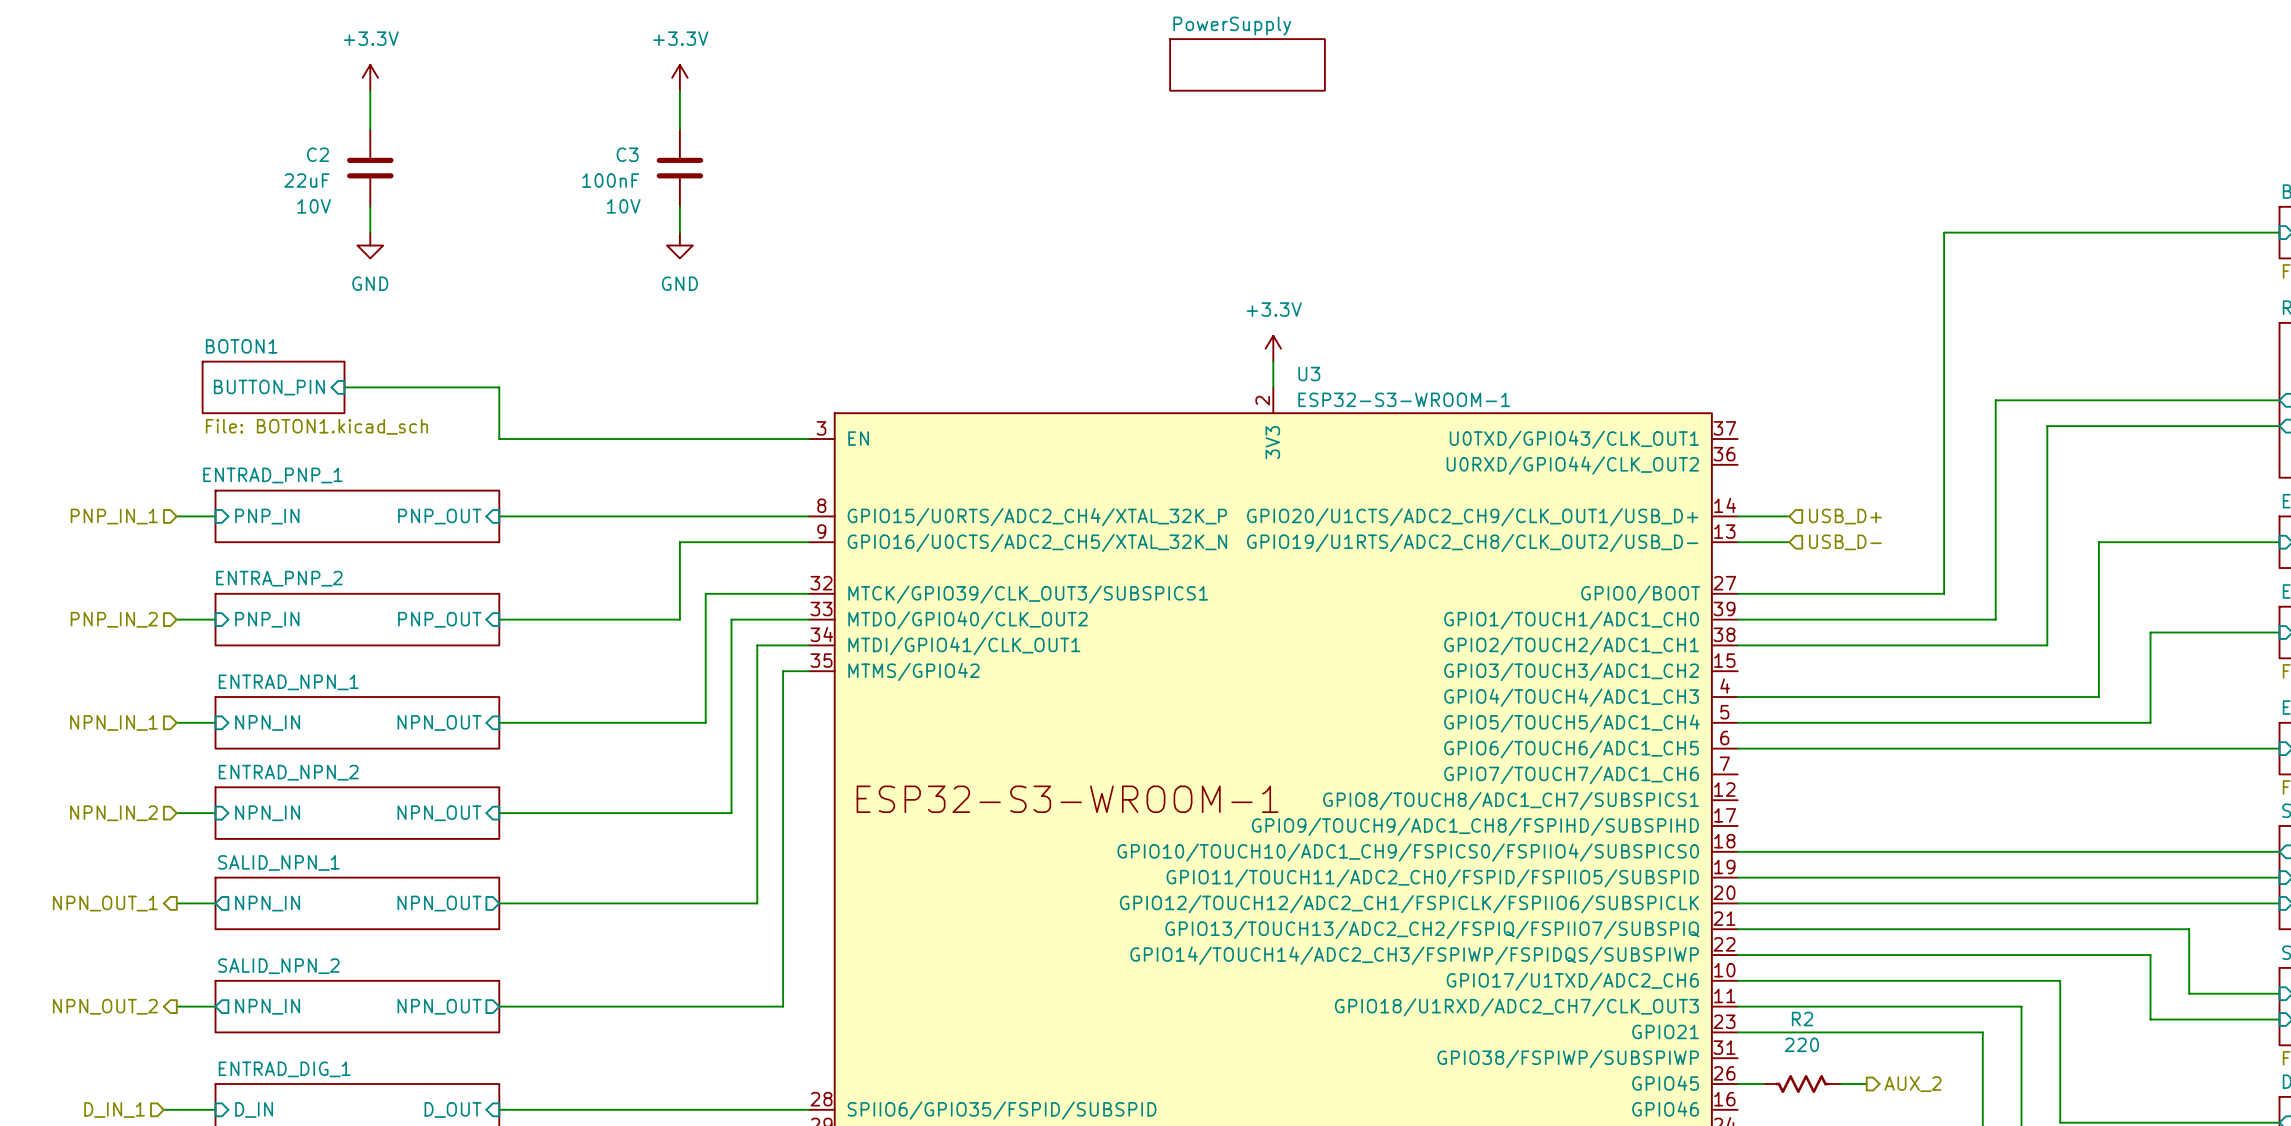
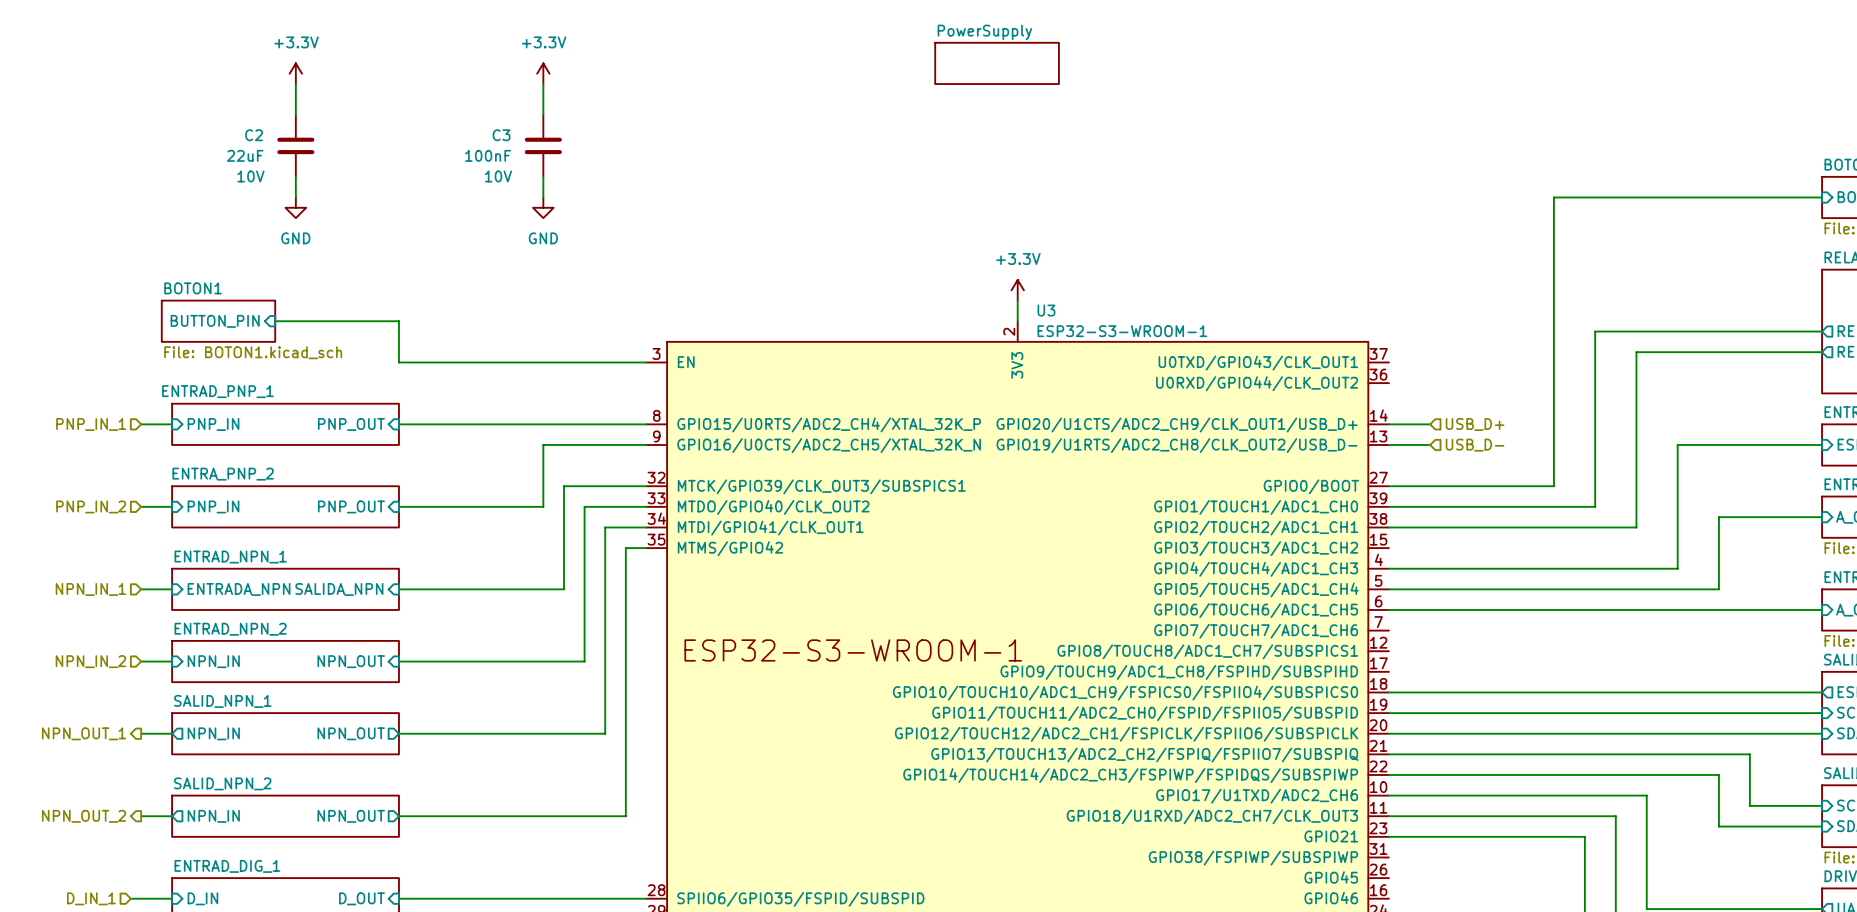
sheet pin: NPN_IN (267, 722) -> ENTRADA_NPN (239, 589)
sheet pin: NPN_OUT (439, 722) -> SALIDA_NPN (339, 589)
wire: (1737, 1084) (1763, 1084) -> none
R2: 220 (1802, 1084) -> none
wire: (1840, 1084) (1866, 1084) -> none
hierarchical label: AUX_2 (1912, 1084) -> none

